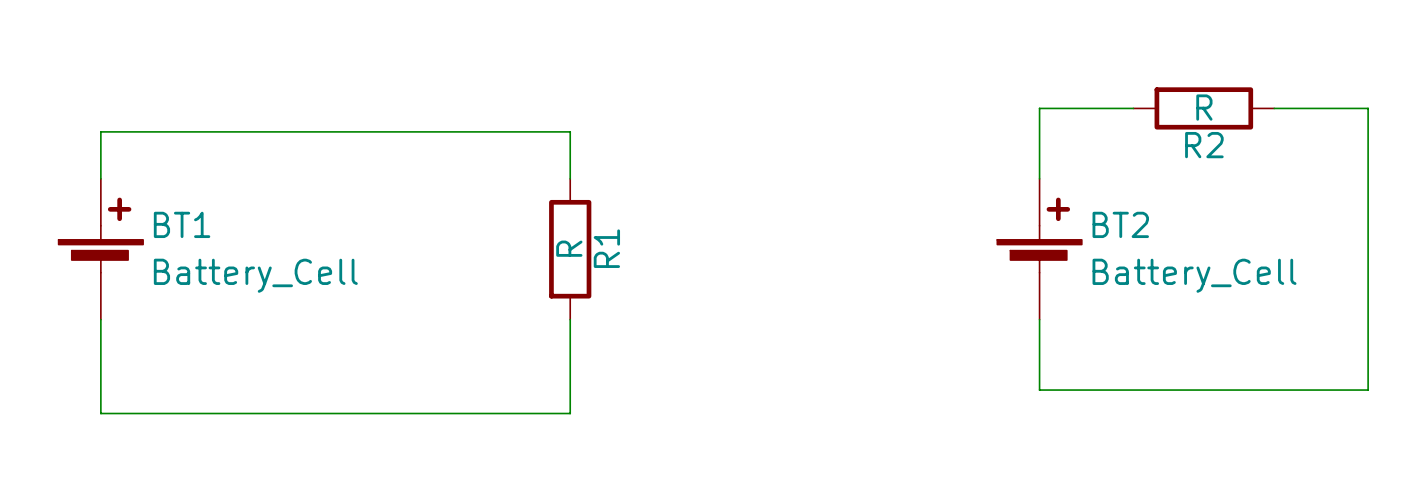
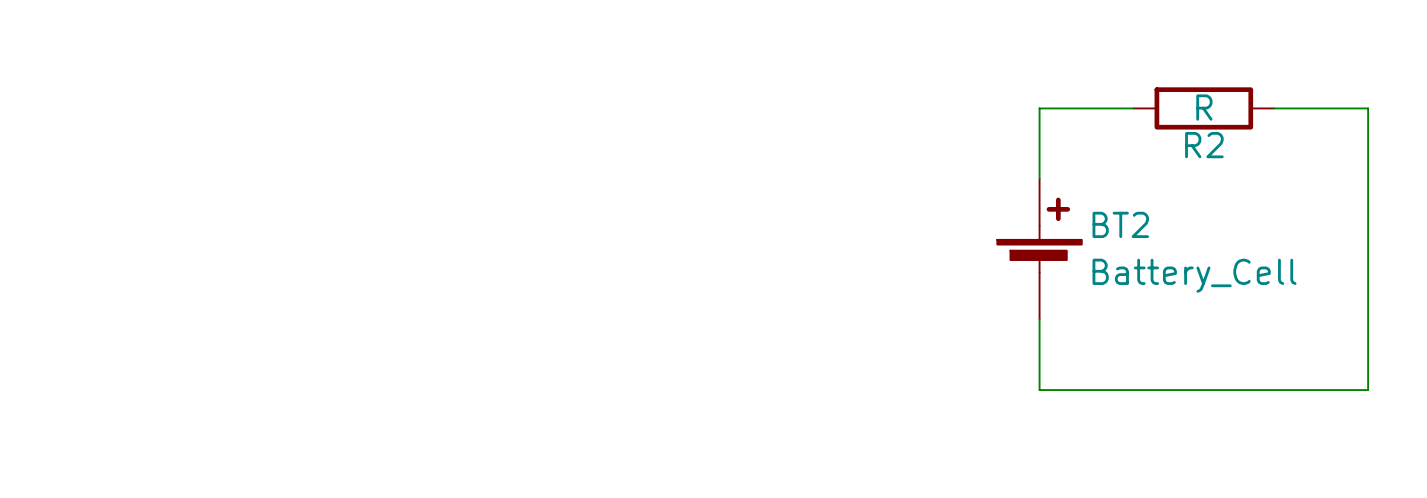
wire: (100, 178) (100, 131) (570, 131) (570, 178) -> none
BT1: Battery_Cell (100, 249) -> none
R1: R (570, 249) -> none
wire: (100, 319) (100, 413) (570, 413) (570, 319) -> none

